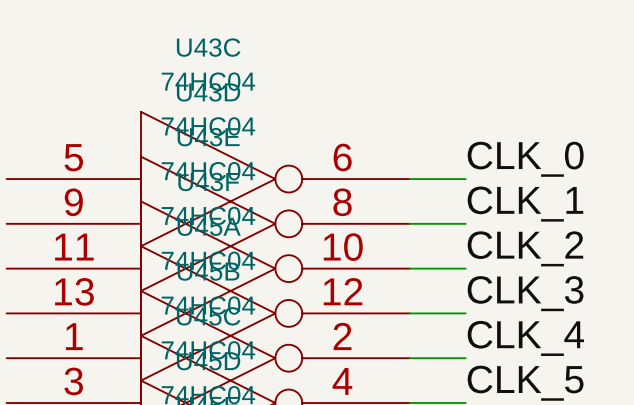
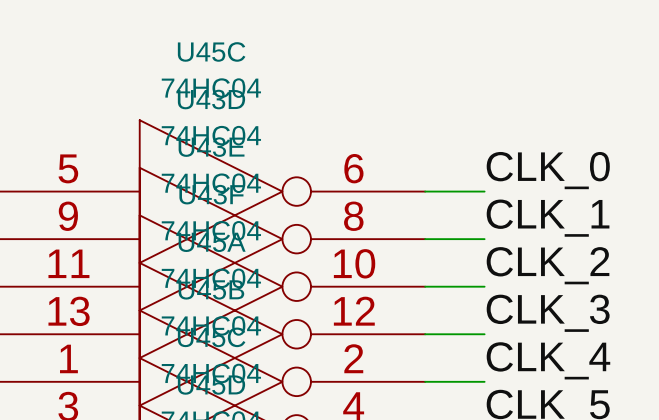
U43C name: U43C (208, 47) -> U45C (211, 51)

